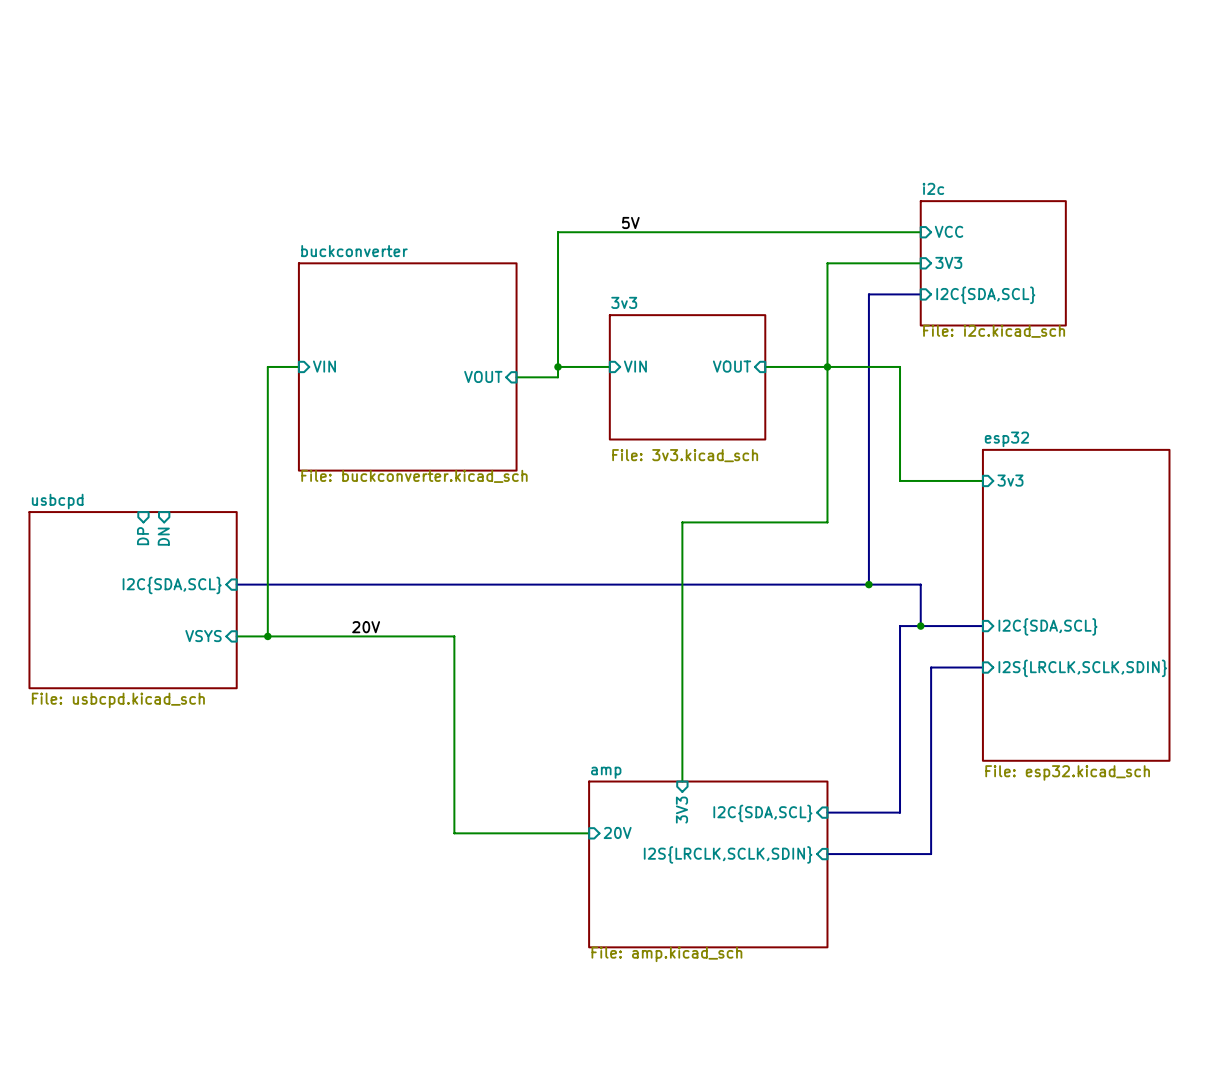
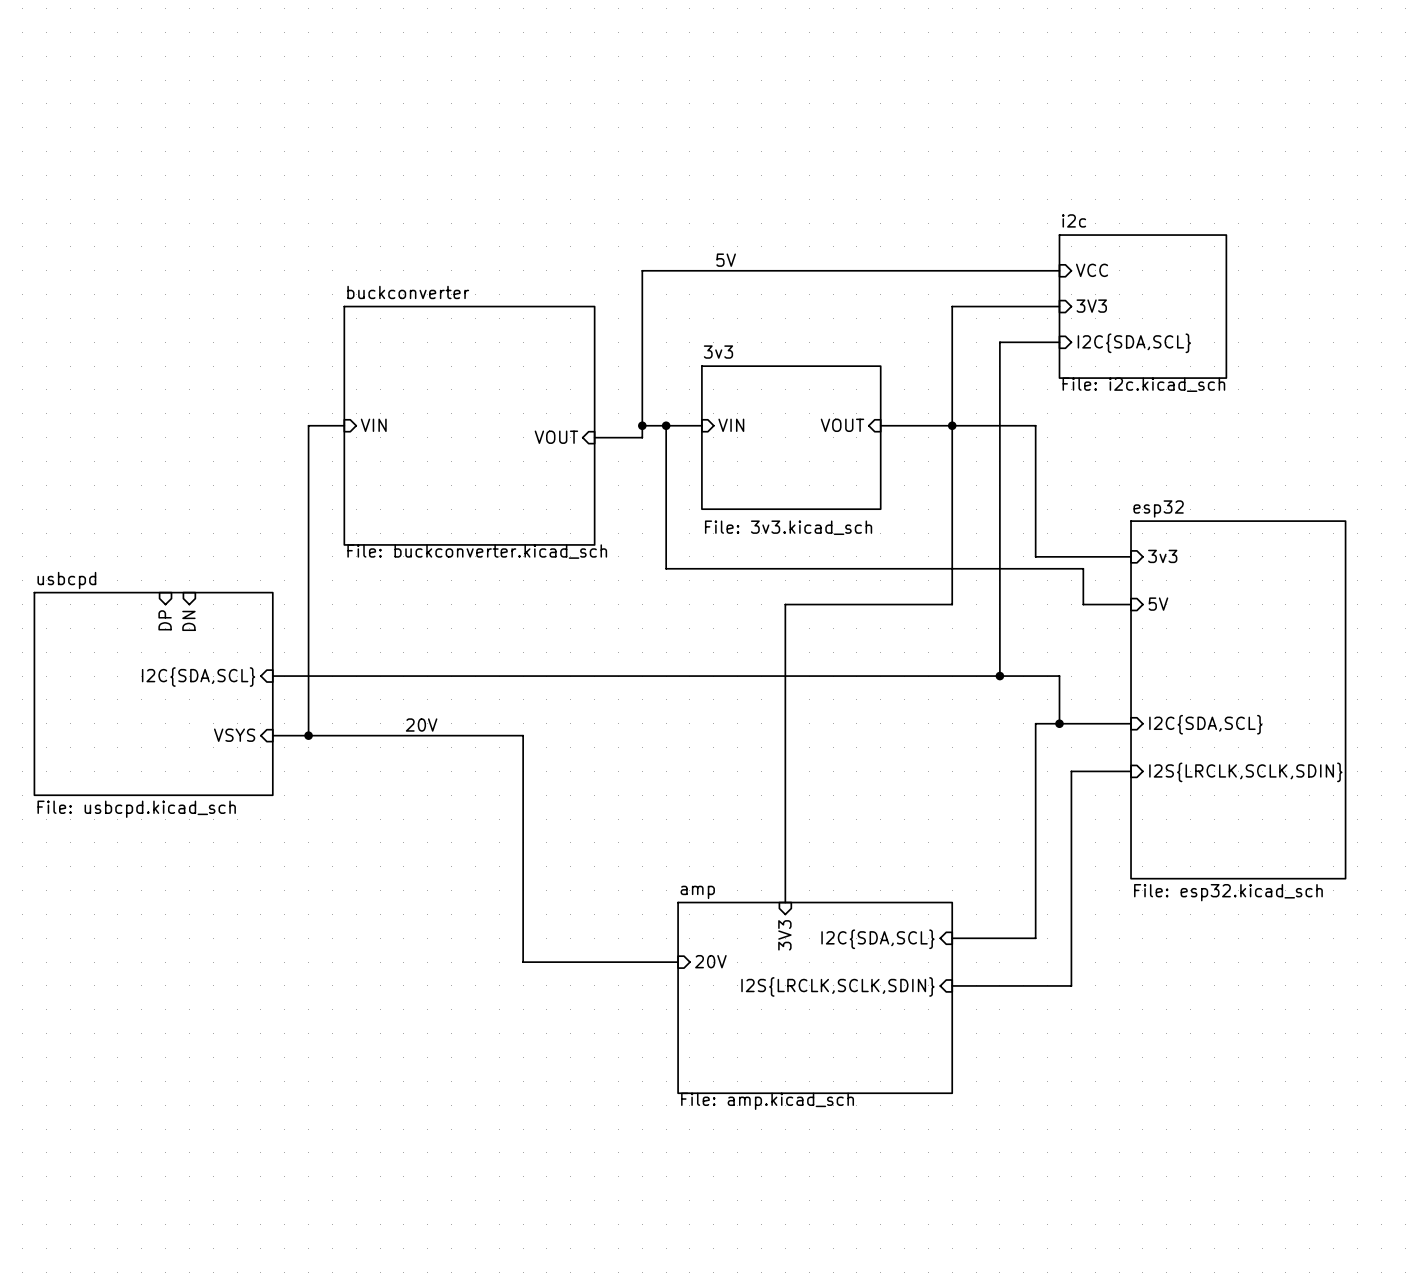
wire: none -> (666, 425) (666, 568) (1083, 568) (1083, 604) (1131, 604)
junction: none -> (666, 425)
sheet pin: none -> 5V (1158, 604)

